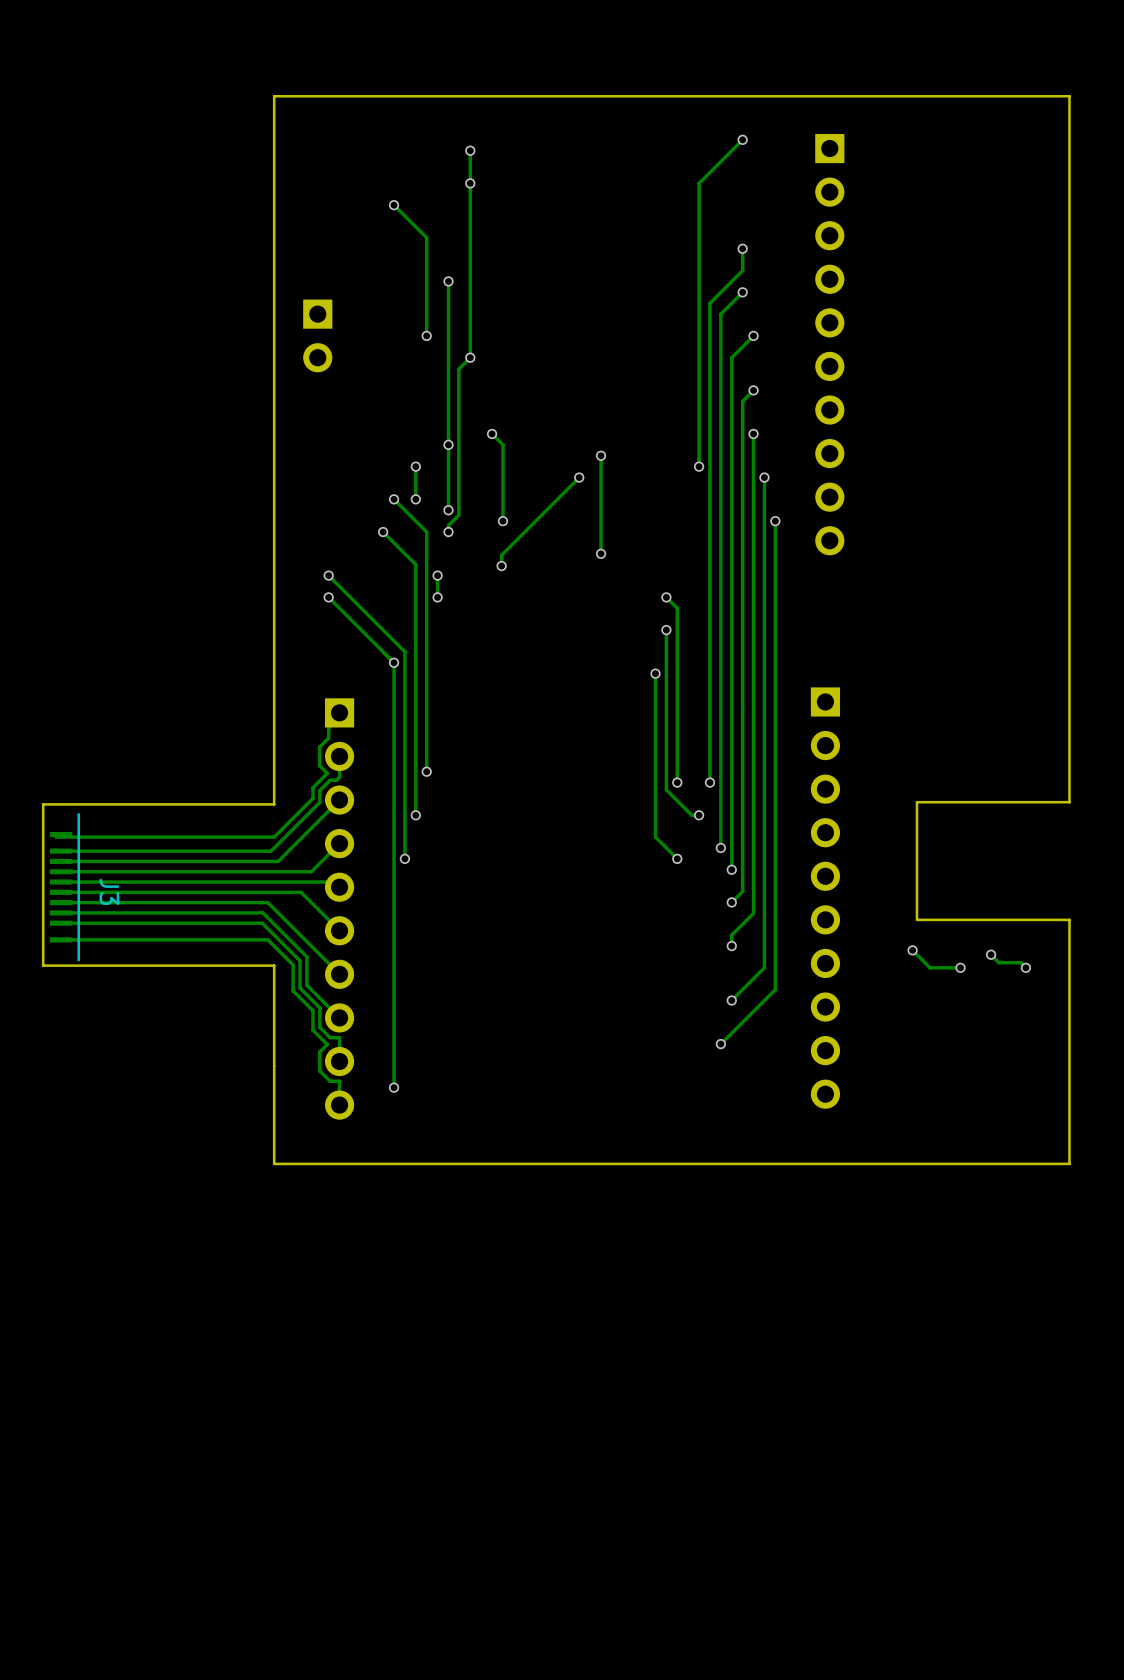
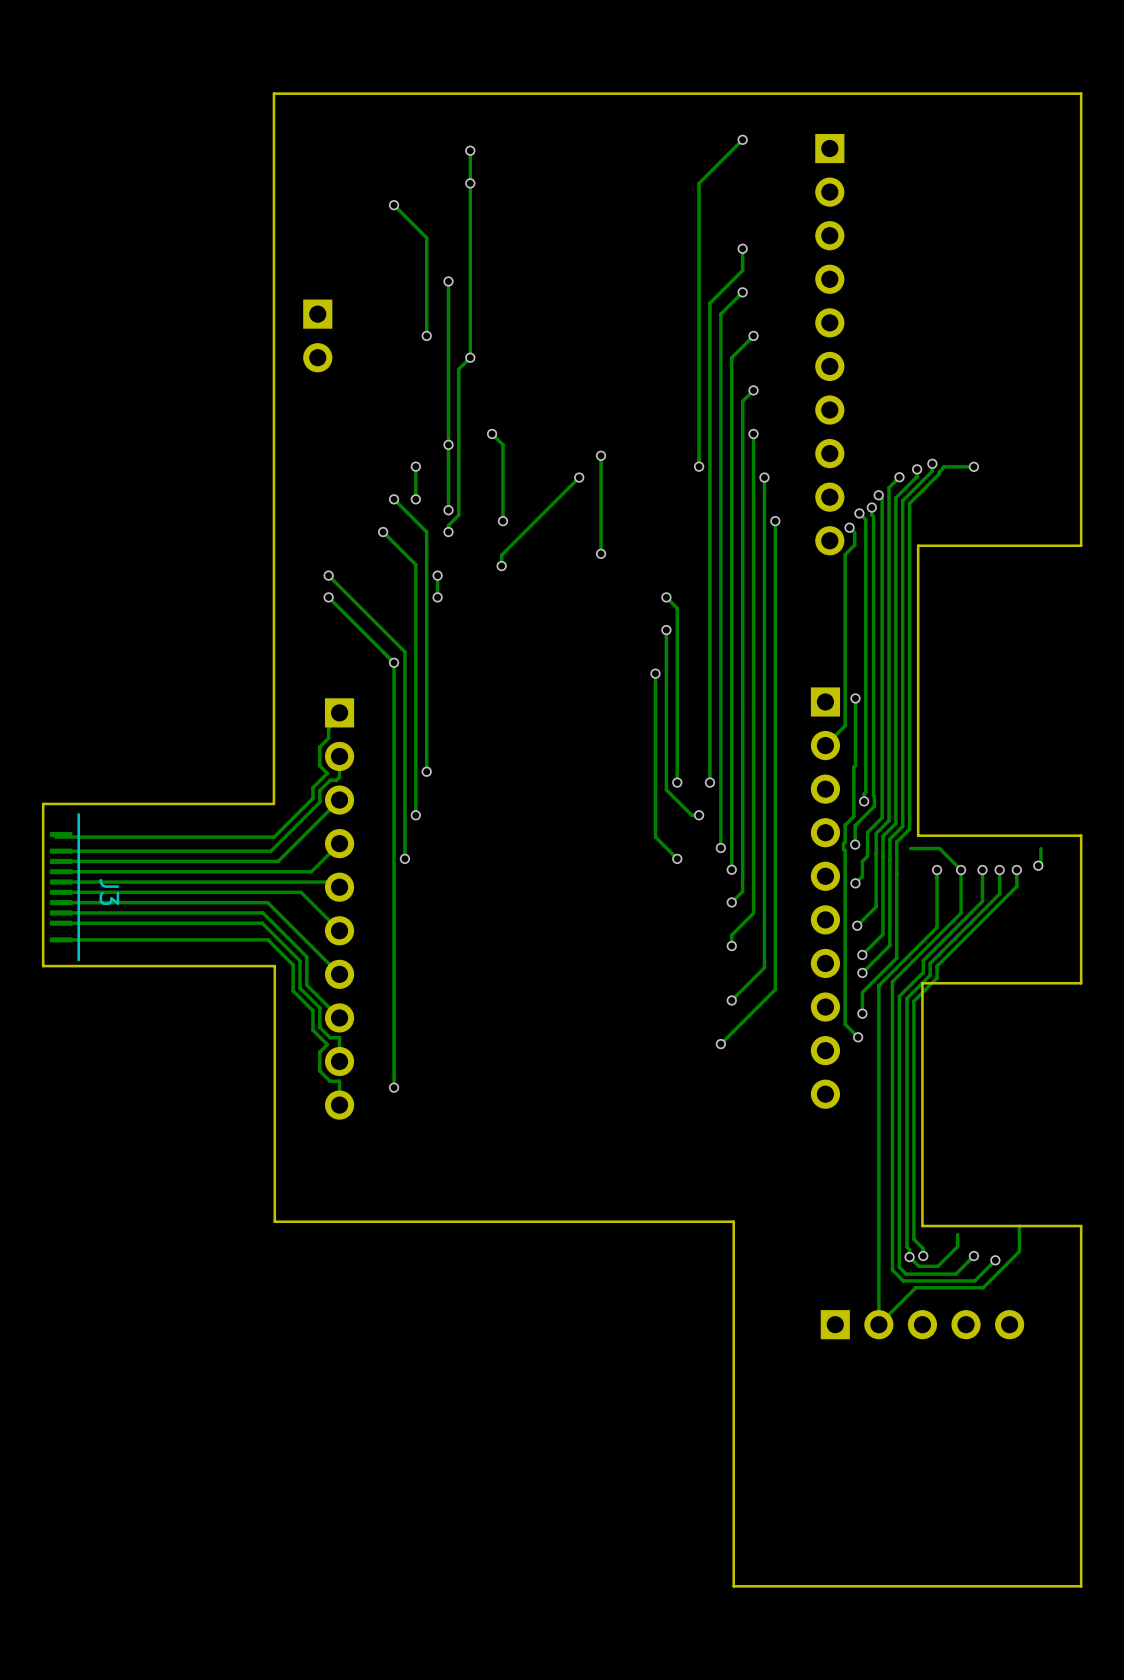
track: none -> (932, 463) (932, 471) (902, 500) (902, 826) (889, 839) (889, 945) (862, 972)
via: none -> (932, 463)
track: none -> (973, 466) (943, 466) (909, 503) (909, 829) (896, 841) (896, 958) (862, 992) (862, 1013)
via: none -> (973, 466)
track: none -> (917, 469) (917, 476) (895, 497) (895, 823) (883, 836) (883, 934) (862, 954)
via: none -> (917, 469)
track: none -> (899, 477) (889, 487) (889, 820) (876, 833) (876, 906) (857, 925)
via: none -> (899, 477)
track: none -> (878, 495) (882, 498) (882, 817) (867, 832) (867, 856) (862, 861) (862, 876) (855, 883)
via: none -> (878, 495)
track: none -> (871, 507) (873, 516) (874, 806) (855, 825) (855, 844)
via: none -> (871, 507)
track: none -> (859, 513) (865, 519) (865, 792) (864, 801)
via: none -> (859, 513)
track: none -> (849, 527) (854, 532) (854, 545) (845, 554) (845, 725) (825, 745)
via: none -> (849, 527)
track: none -> (855, 698) (853, 816) (845, 825) (843, 849) (845, 850) (845, 1024) (858, 1037)
via: none -> (855, 698)
via: none -> (864, 801)
board edge: (43, 804) (274, 804) (274, 96) (1069, 96) (1069, 802) (916, 802) (916, 919) (1069, 919) (1069, 1163) (274, 1163) (274, 965) (43, 965) -> (43, 804) (273, 803) (273, 93) (1081, 93) (1081, 545) (918, 545) (918, 835) (1081, 835) (1081, 983) (922, 983) (922, 1226) (1081, 1226) (1081, 1586) (733, 1586) (733, 1221) (274, 1221) (274, 966) (43, 965)
via: none -> (855, 844)
track: none -> (910, 848) (939, 848) (961, 870) (961, 913) (892, 981) (892, 1270) (903, 1280) (974, 1280) (995, 1260)
track: none -> (1040, 848) (1040, 863) (1038, 865)
via: none -> (1038, 865)
track: none -> (937, 870) (937, 927) (878, 985) (878, 1324) (915, 1287) (983, 1287) (1019, 1251) (1019, 1226)
via: none -> (937, 870)
via: none -> (961, 870)
track: none -> (982, 870) (982, 901) (923, 960) (923, 972) (899, 996) (899, 1267) (906, 1274) (955, 1274) (973, 1256)
via: none -> (982, 870)
track: none -> (999, 870) (999, 893) (930, 963) (930, 975) (907, 998) (907, 1247) (909, 1249) (909, 1257) (918, 1266) (937, 1266) (957, 1246) (957, 1234)
via: none -> (999, 870)
track: none -> (1016, 870) (1016, 886) (937, 966) (937, 978) (913, 1001) (913, 1239) (923, 1248) (923, 1255)
via: none -> (1016, 870)
via: none -> (855, 883)
via: none -> (857, 925)
track: (912, 950) (930, 967) (960, 967) -> none
via: (912, 950) -> none
via: none -> (862, 954)
track: (991, 954) (998, 962) (1020, 962) (1025, 967) -> none
via: (991, 954) -> none
via: (960, 967) -> none
via: (1025, 967) -> none
via: none -> (862, 972)
via: none -> (862, 1013)
via: none -> (858, 1037)
via: none -> (923, 1255)
via: none -> (973, 1256)
via: none -> (909, 1257)
via: none -> (995, 1260)
part: none -> (922, 1324)

